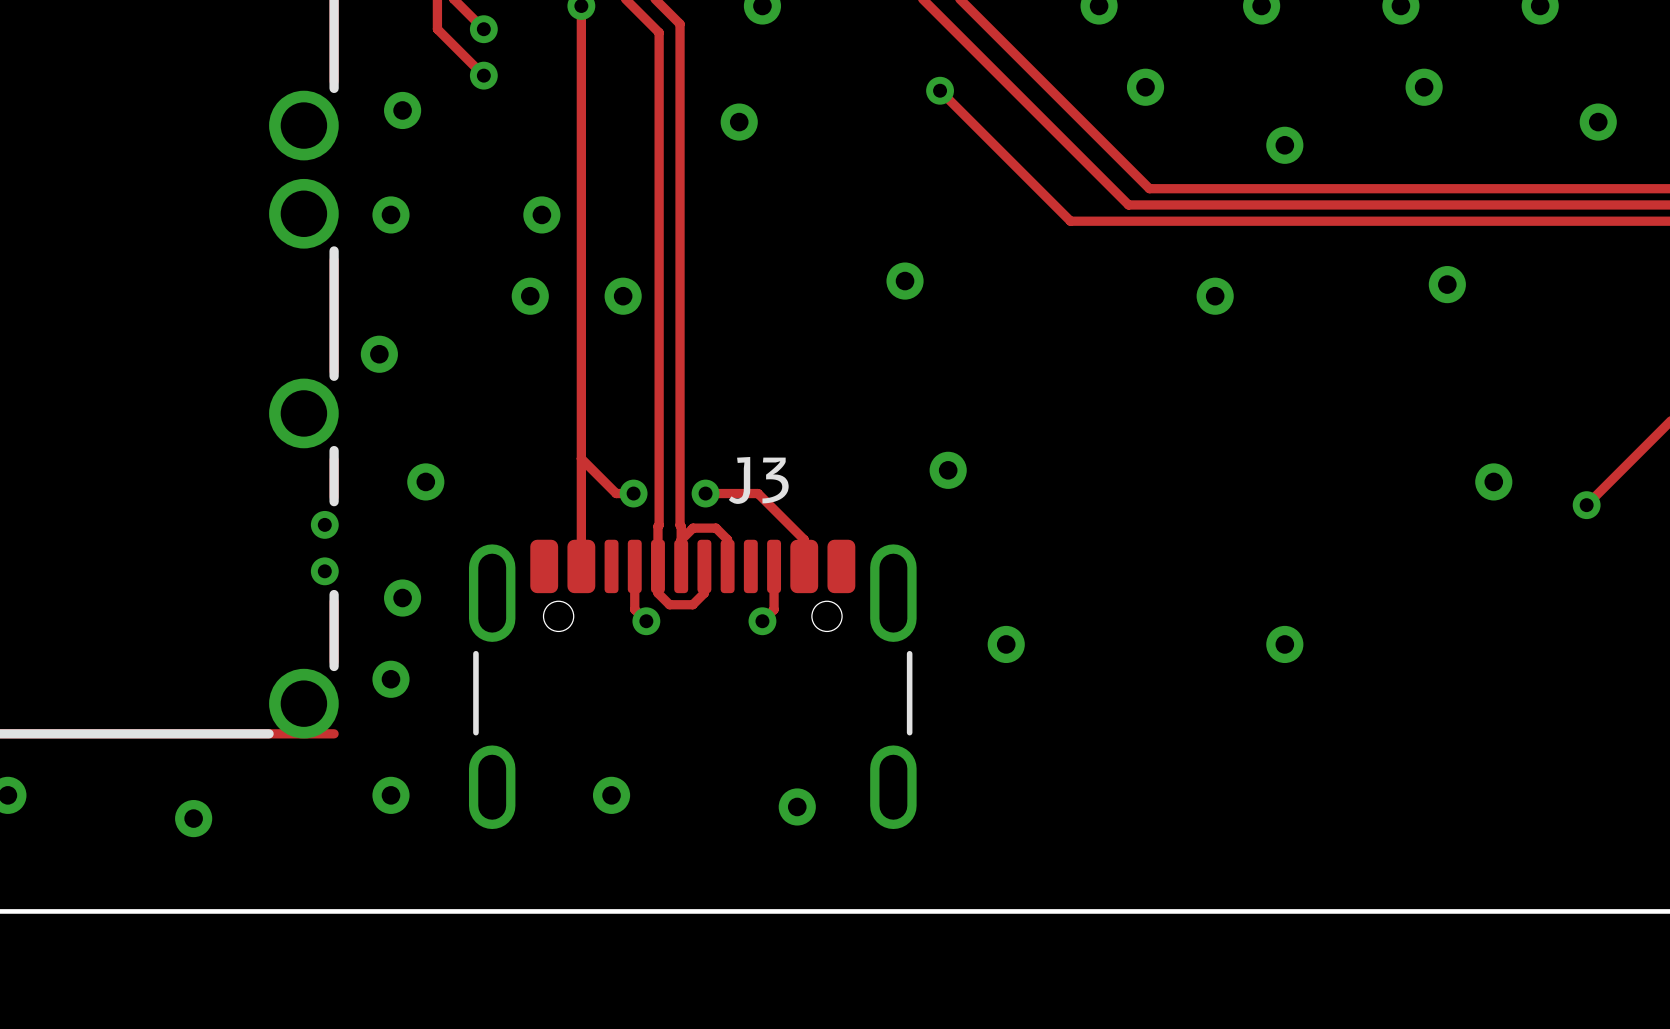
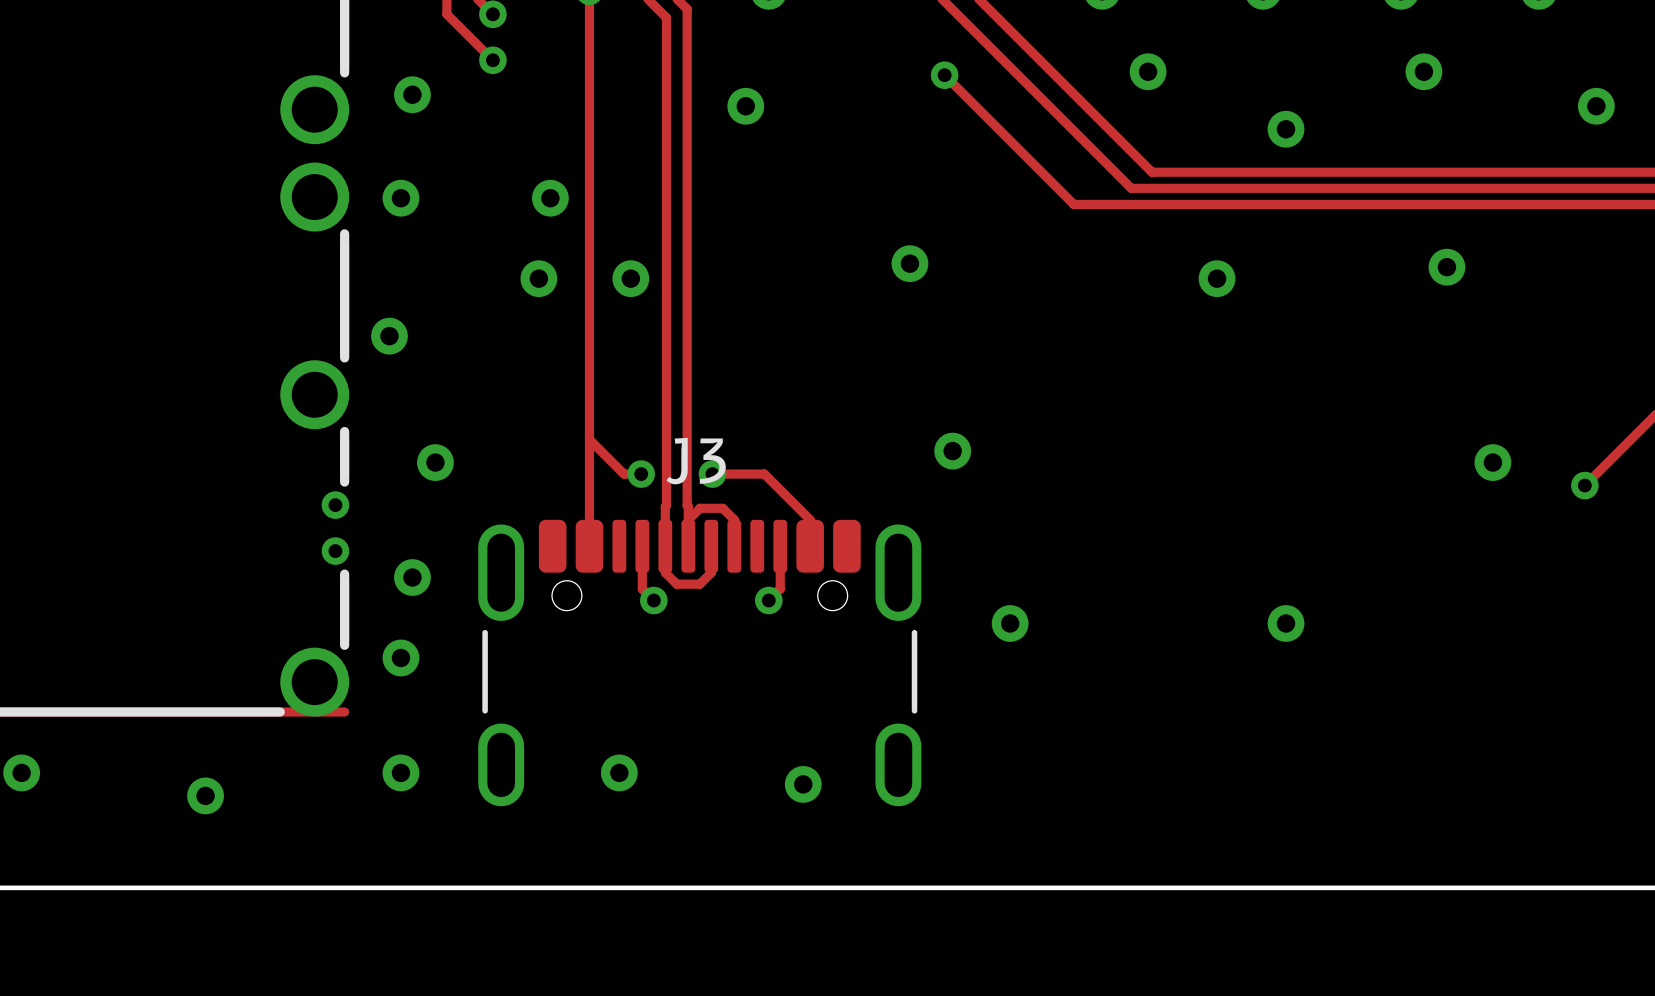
J3 name position: J3 (758, 480) -> J3 (696, 461)

